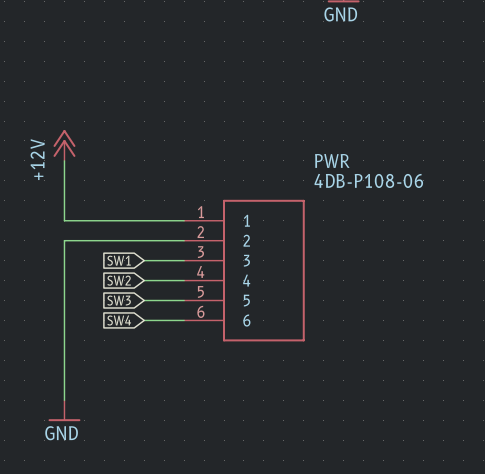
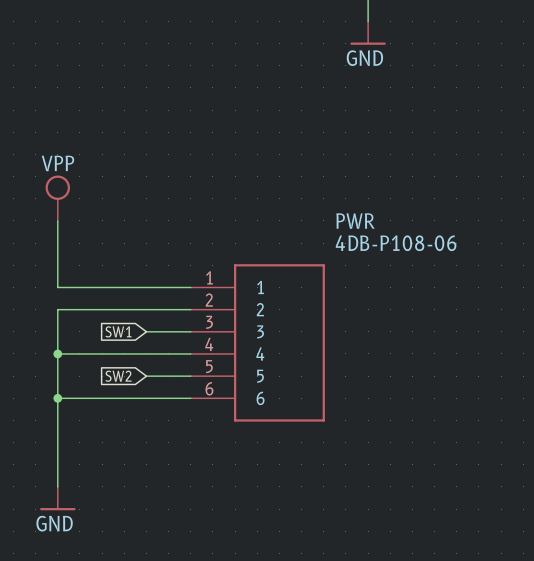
power symbol: +12V (64, 145) -> VPP (57, 198)
wire: none -> (57, 353) (146, 353)
junction: none -> (57, 353)
global label: SW2 (119, 280) -> none
global label: SW3 (119, 300) -> SW2 (118, 376)
wire: none -> (57, 398) (146, 398)
junction: none -> (57, 398)
global label: SW4 (119, 320) -> none

